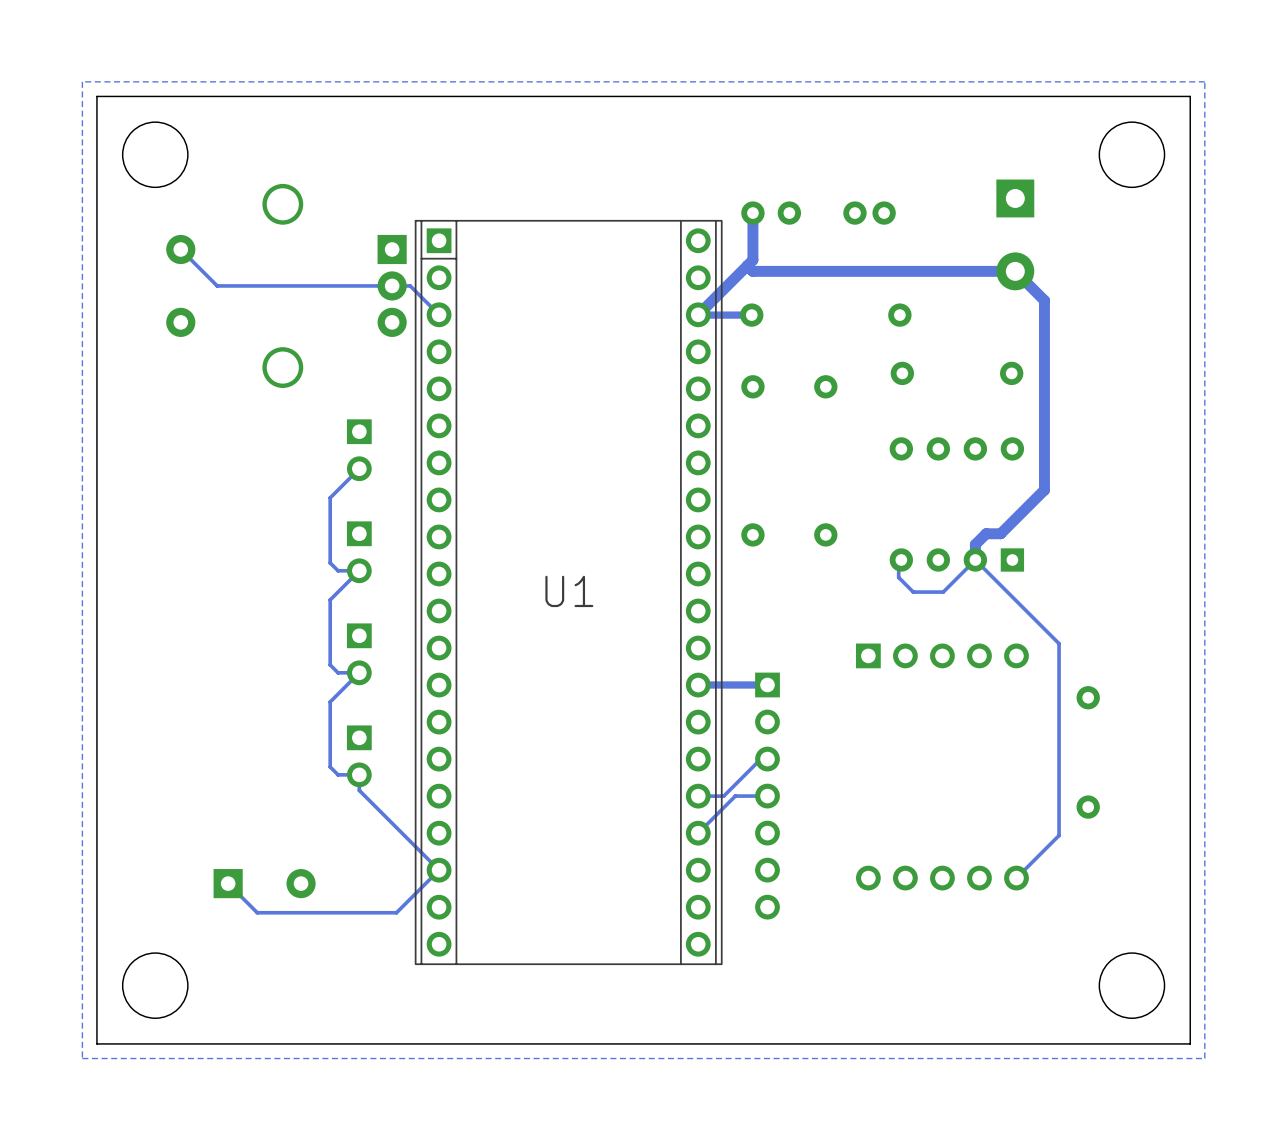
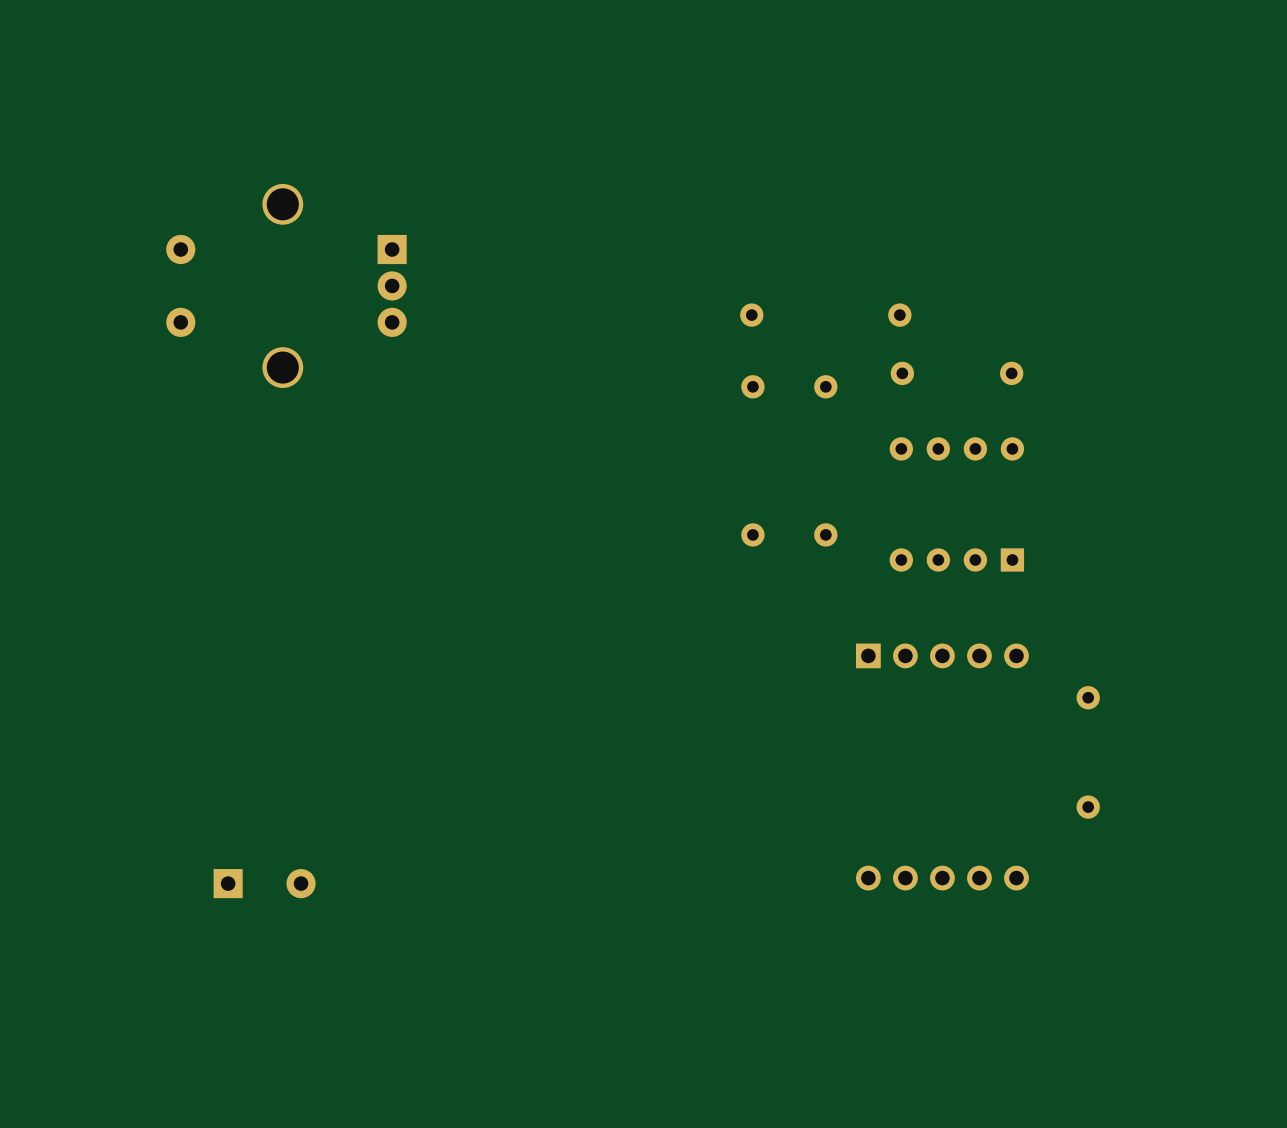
zone outline: (1204, 81) (1204, 1058) (82, 1058) (82, 81) (1204, 81) -> none
board edge: (1190, 96) (96, 96) (96, 1043) (1190, 1043) (1190, 96) -> none
round board edge: [121, 121, 189, 189] -> none
round board edge: [1098, 121, 1166, 189] -> none
track: (752, 213) (752, 260) (698, 314) (751, 315) -> none
part: (771, 213) -> none
part: (869, 213) -> none
part: (1015, 234) -> none
track: (180, 249) (217, 285) (410, 285) (439, 314) -> none
track: (747, 265) (752, 271) (1015, 271) (1044, 300) (1044, 490) (1000, 533) (986, 533) (975, 544) (975, 559) -> none
part: (359, 450) -> none
track: (359, 468) (330, 497) (330, 562) (338, 570) (359, 570) (330, 599) (330, 664) (338, 672) (359, 672) (330, 701) (330, 766) (338, 774) (359, 774) (359, 790) (439, 870) (396, 912) (257, 912) (228, 883) -> none
part: (359, 552) -> none
track: (975, 559) (1059, 643) (1059, 835) (1016, 878) -> none
track: (975, 559) (943, 592) (913, 592) (898, 577) (898, 562) (901, 559) -> none
U1: (568, 592) -> none
part: (359, 654) -> none
track: (767, 684) (698, 684) -> none
part: (359, 756) -> none
track: (760, 759) (723, 796) (698, 796) -> none
track: (767, 796) (735, 796) (698, 833) -> none
part: (767, 796) -> none
round board edge: [121, 952, 189, 1019] -> none
round board edge: [1098, 952, 1166, 1019] -> none

